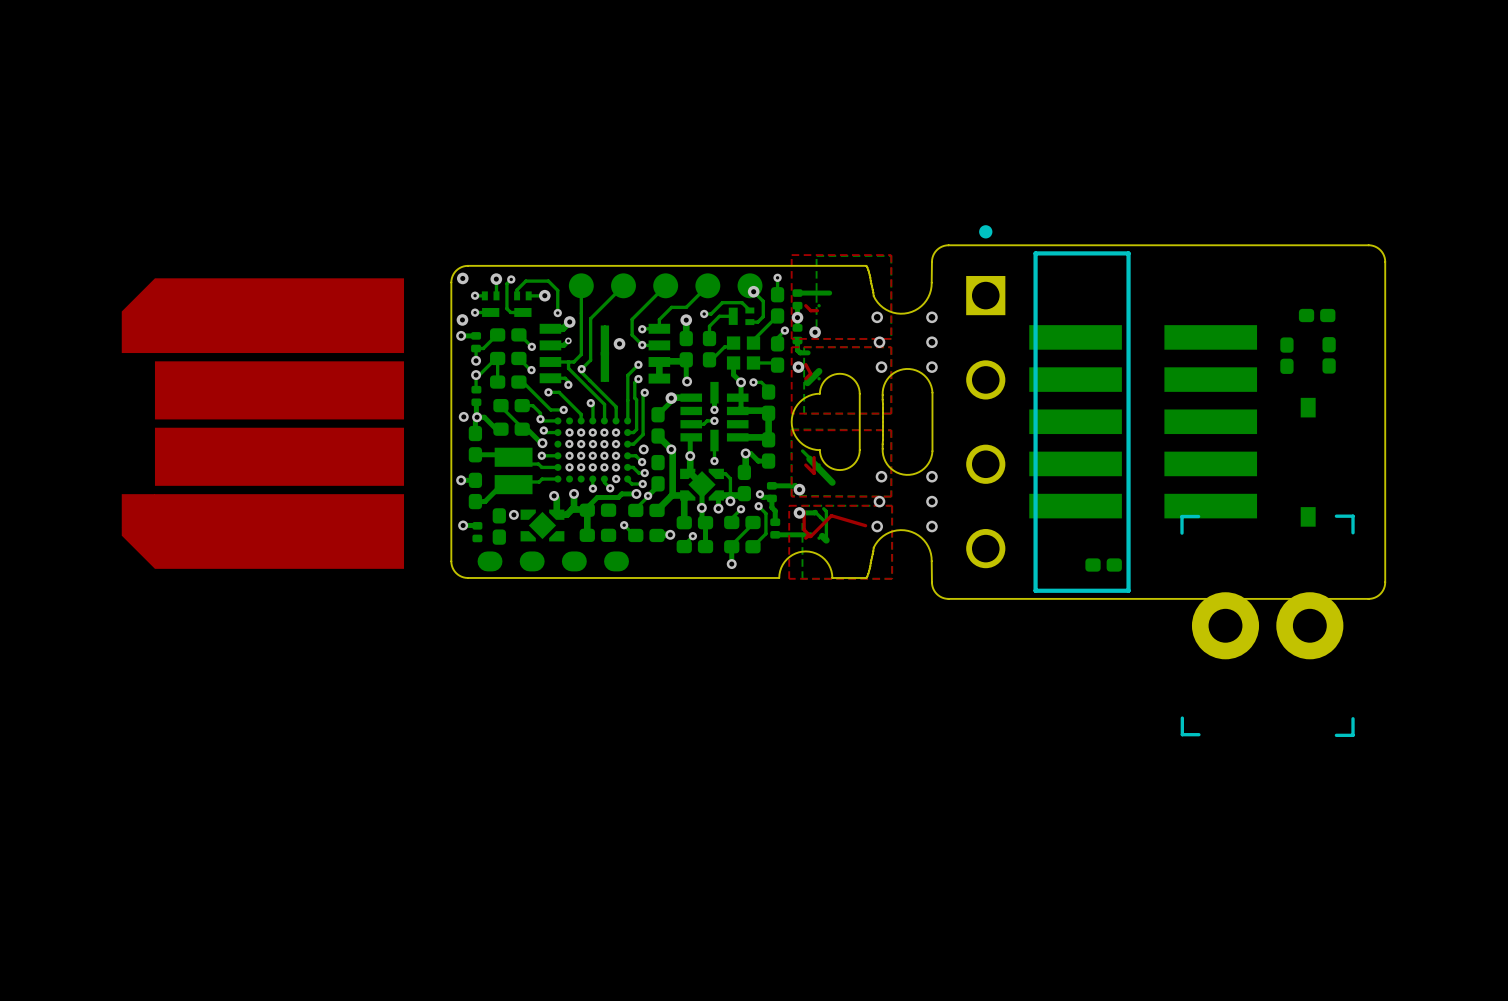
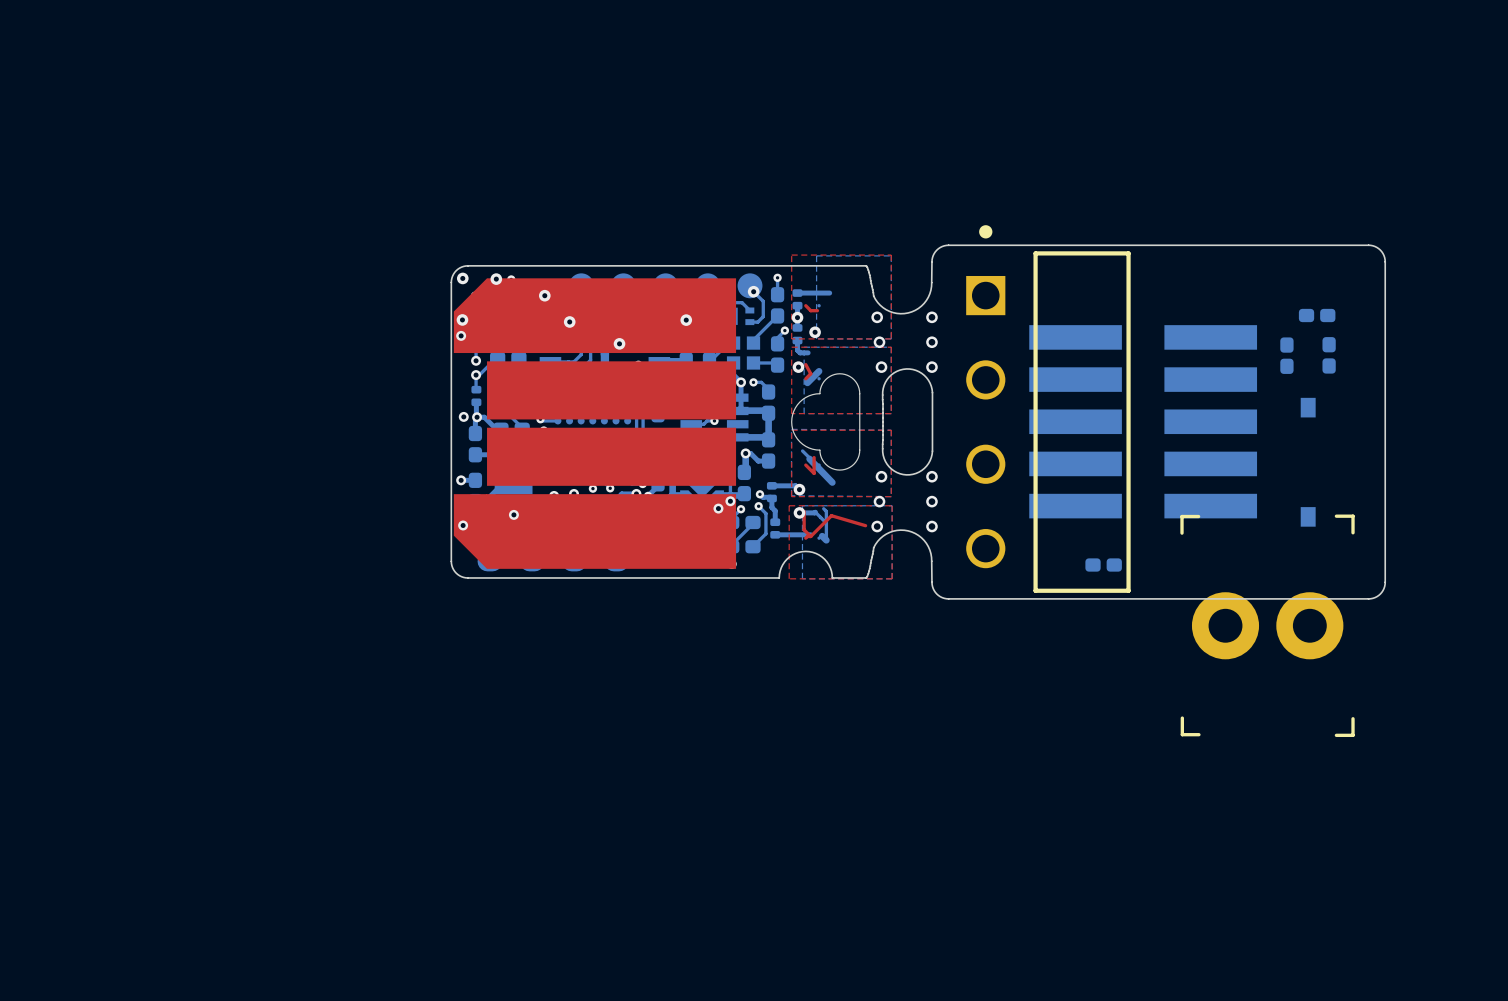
part position: (262, 423) -> (594, 423)

